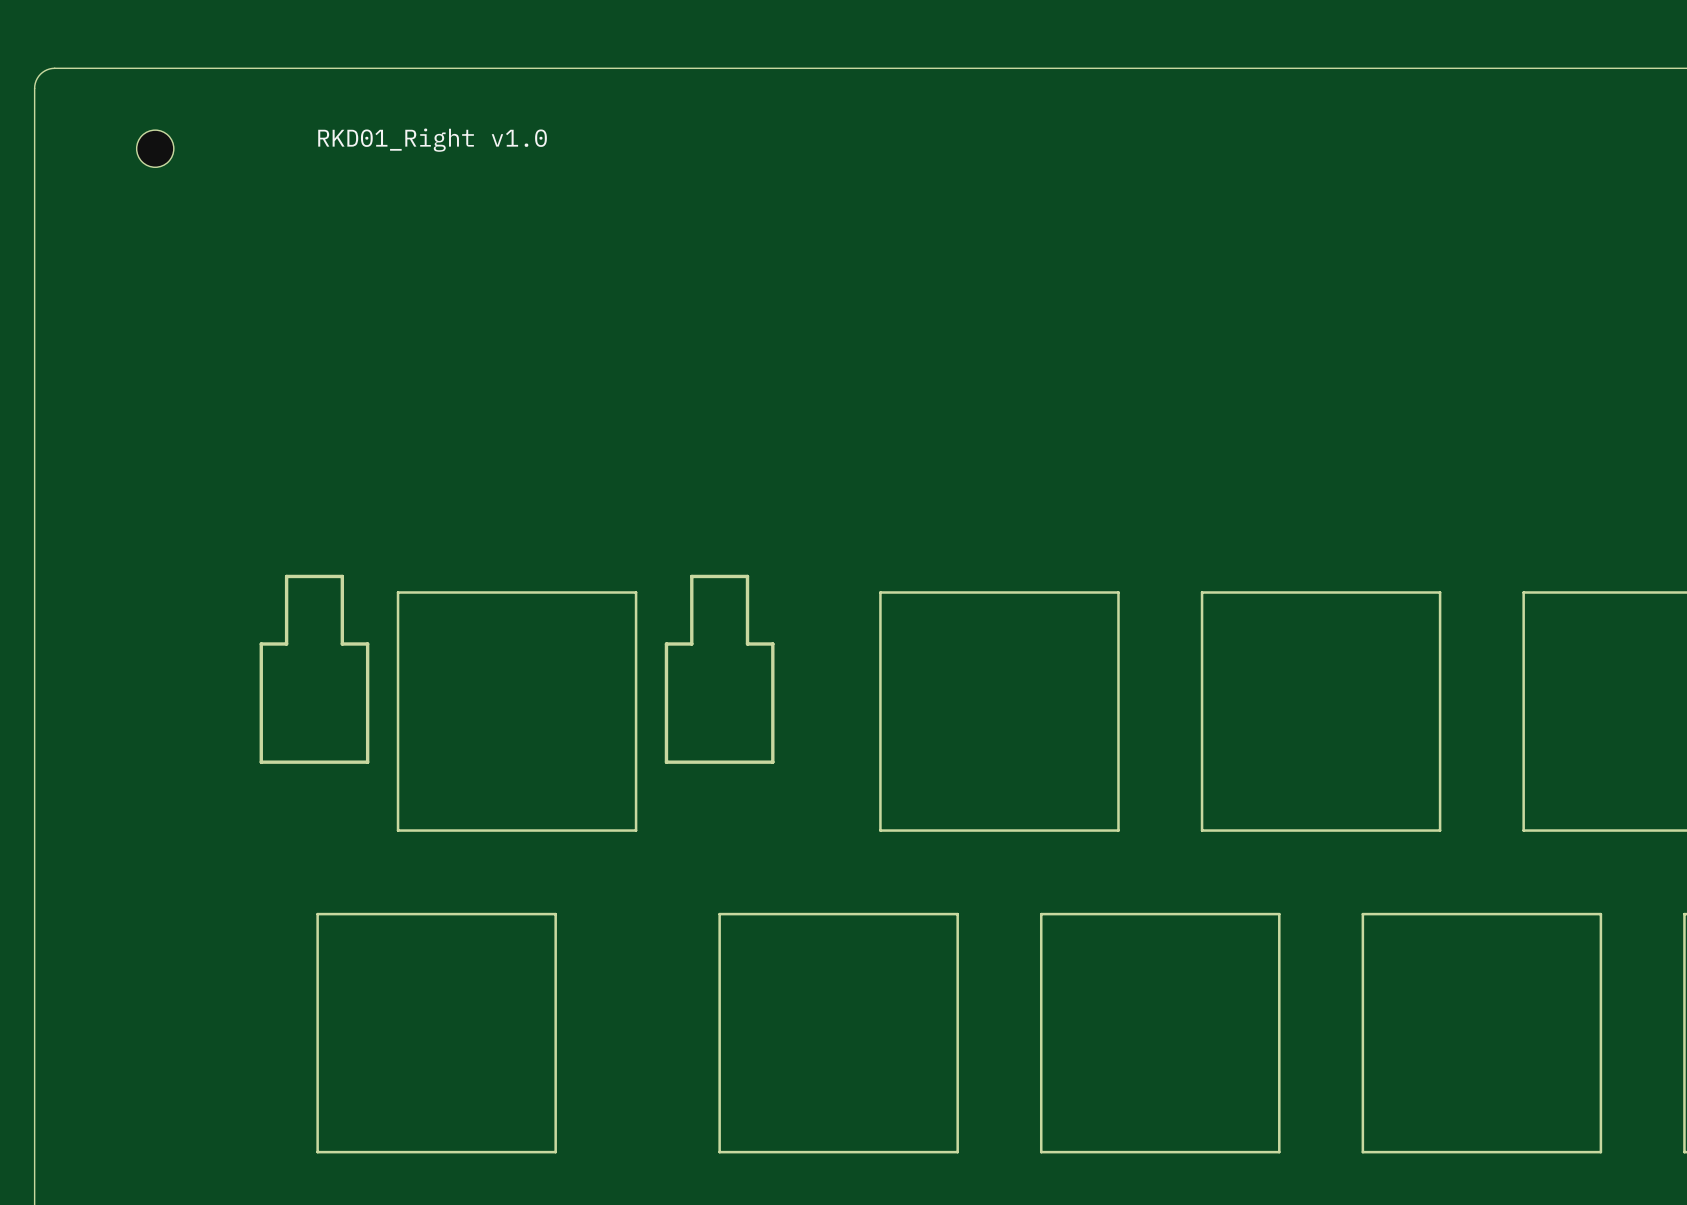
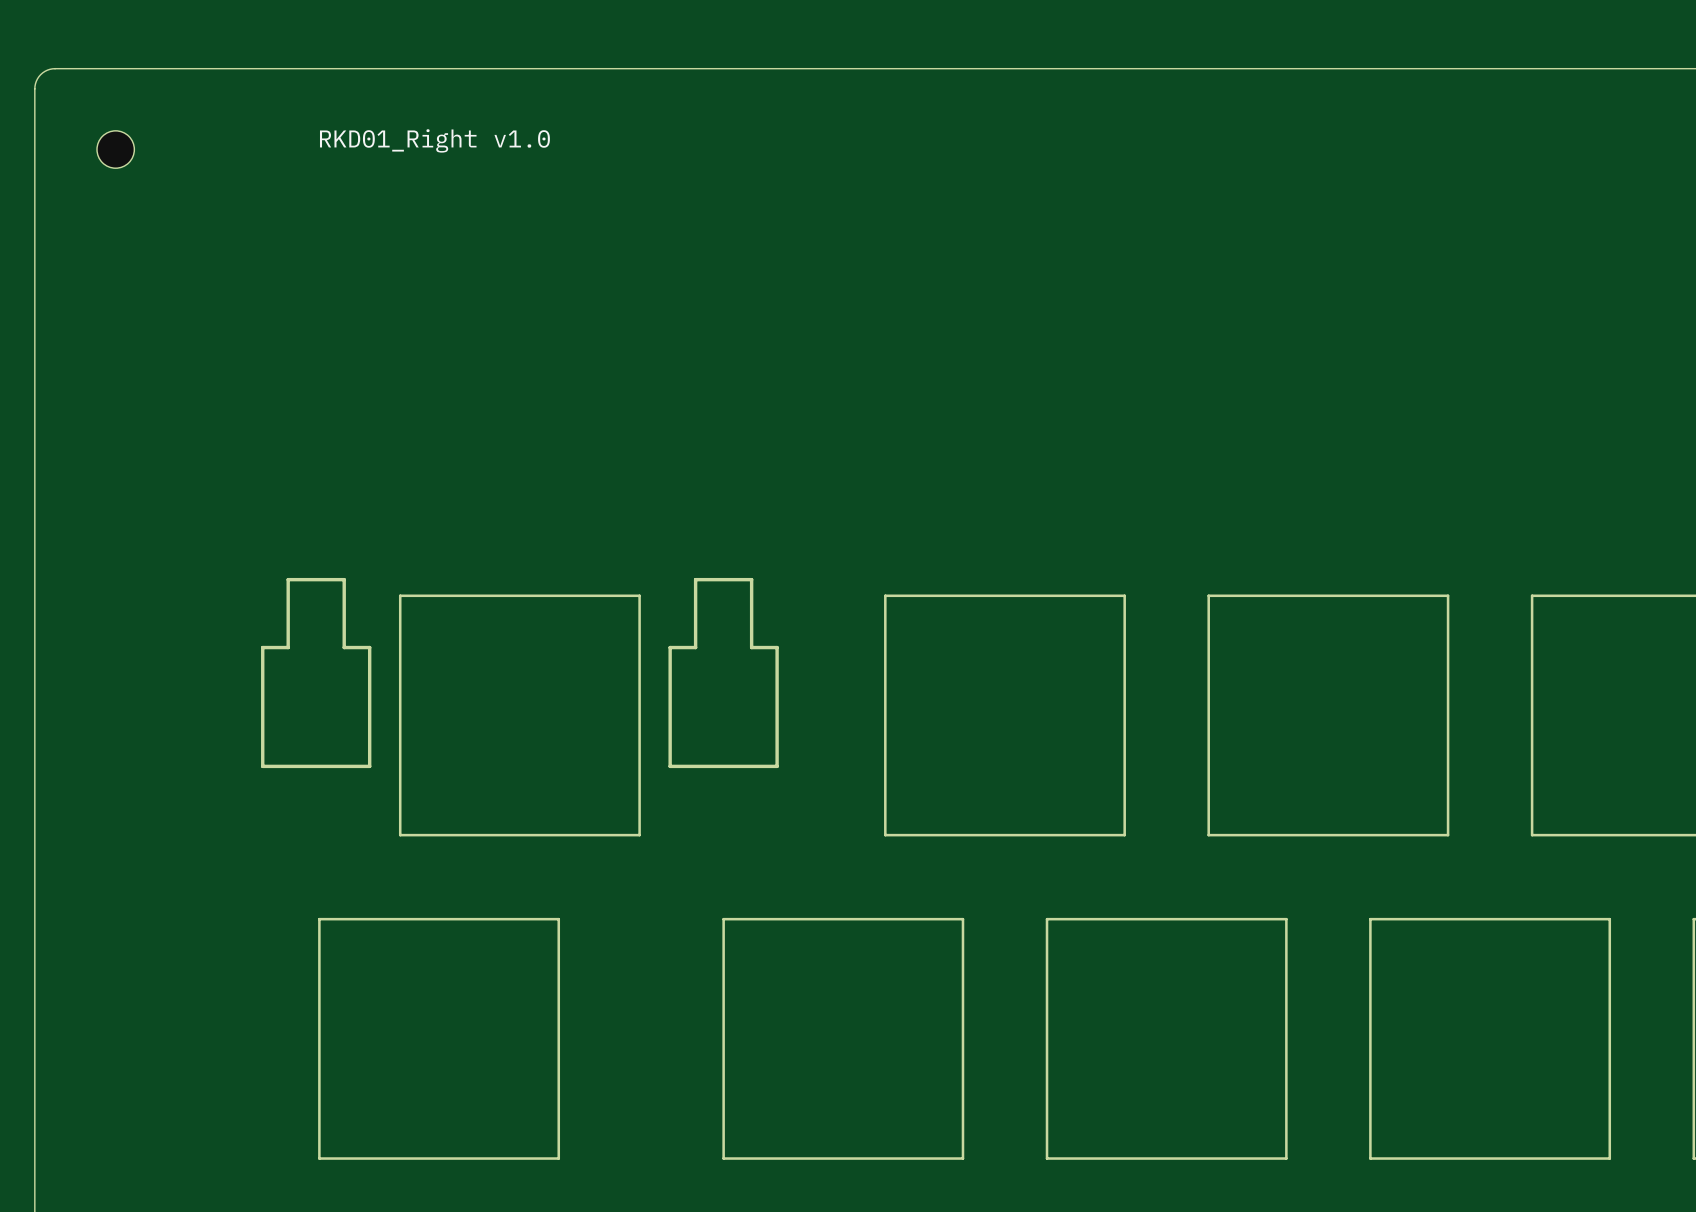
part position: (155, 148) -> (115, 149)

